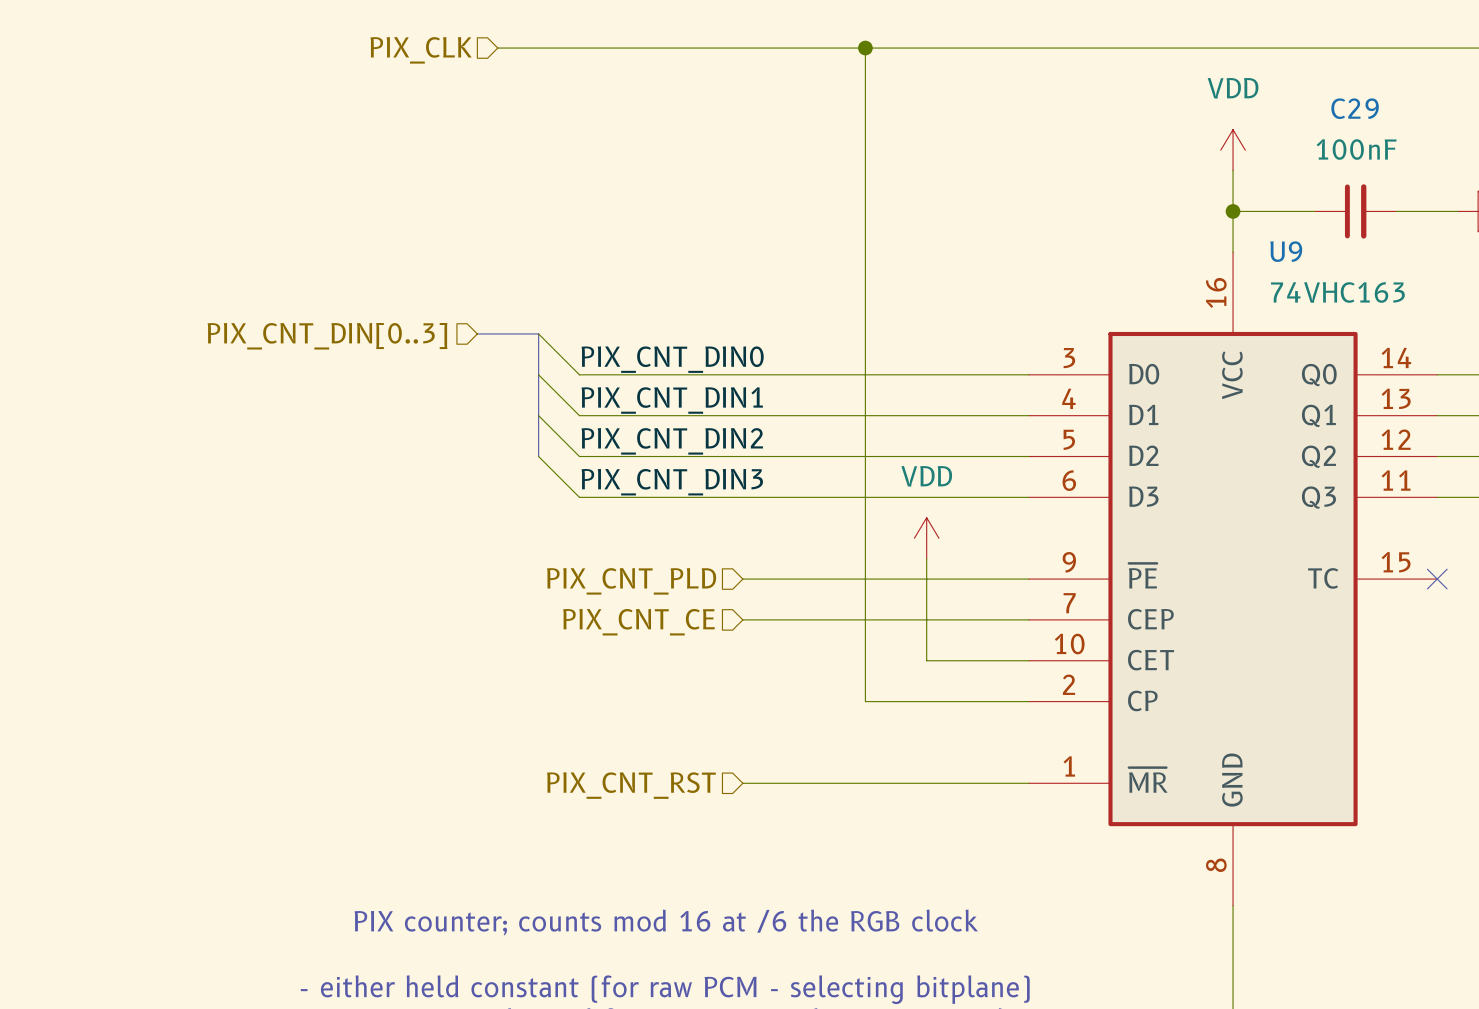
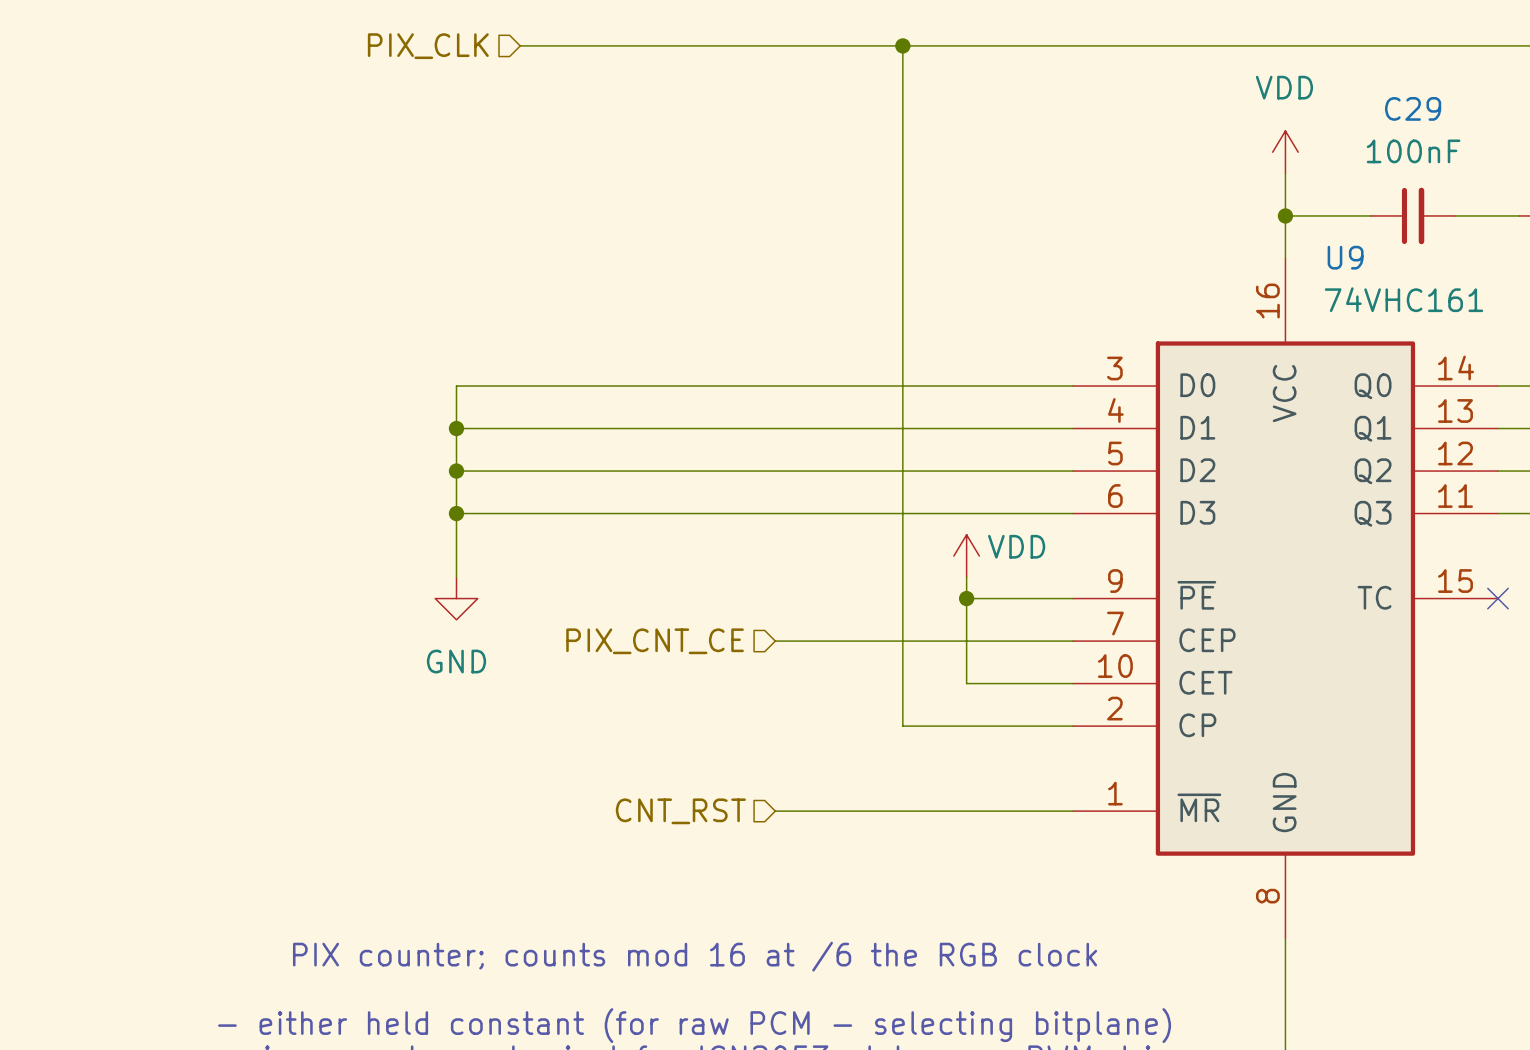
U9 value: 74VHC163 (1337, 292) -> 74VHC161 (1403, 299)
bus: (477, 333) (538, 333) (538, 456) -> none
wire: (538, 333) (579, 374) -> (456, 577) (456, 386) (605, 386)
hierarchical label: PIX_CNT_DIN[0..3] (327, 336) -> none
label: PIX_CNT_DIN0 (672, 359) -> none
wire: (538, 374) (579, 415) -> (456, 428) (605, 428)
label: PIX_CNT_DIN1 (672, 400) -> none
junction: none -> (456, 428)
wire: (538, 415) (579, 456) -> (456, 471) (605, 471)
label: PIX_CNT_DIN2 (672, 441) -> none
junction: none -> (456, 471)
wire: (538, 456) (579, 497) -> (456, 513) (605, 513)
power symbol text position: VDD (926, 476) -> VDD (1016, 546)
label: PIX_CNT_DIN3 (672, 482) -> none
junction: none -> (456, 513)
power symbol: none -> GND (456, 598)
wire: (742, 579) (926, 579) -> none
junction: none -> (966, 598)
hierarchical label: PIX_CNT_PLD (631, 581) -> none
hierarchical label: PIX_CNT_RST (631, 785) -> CNT_RST (680, 811)

